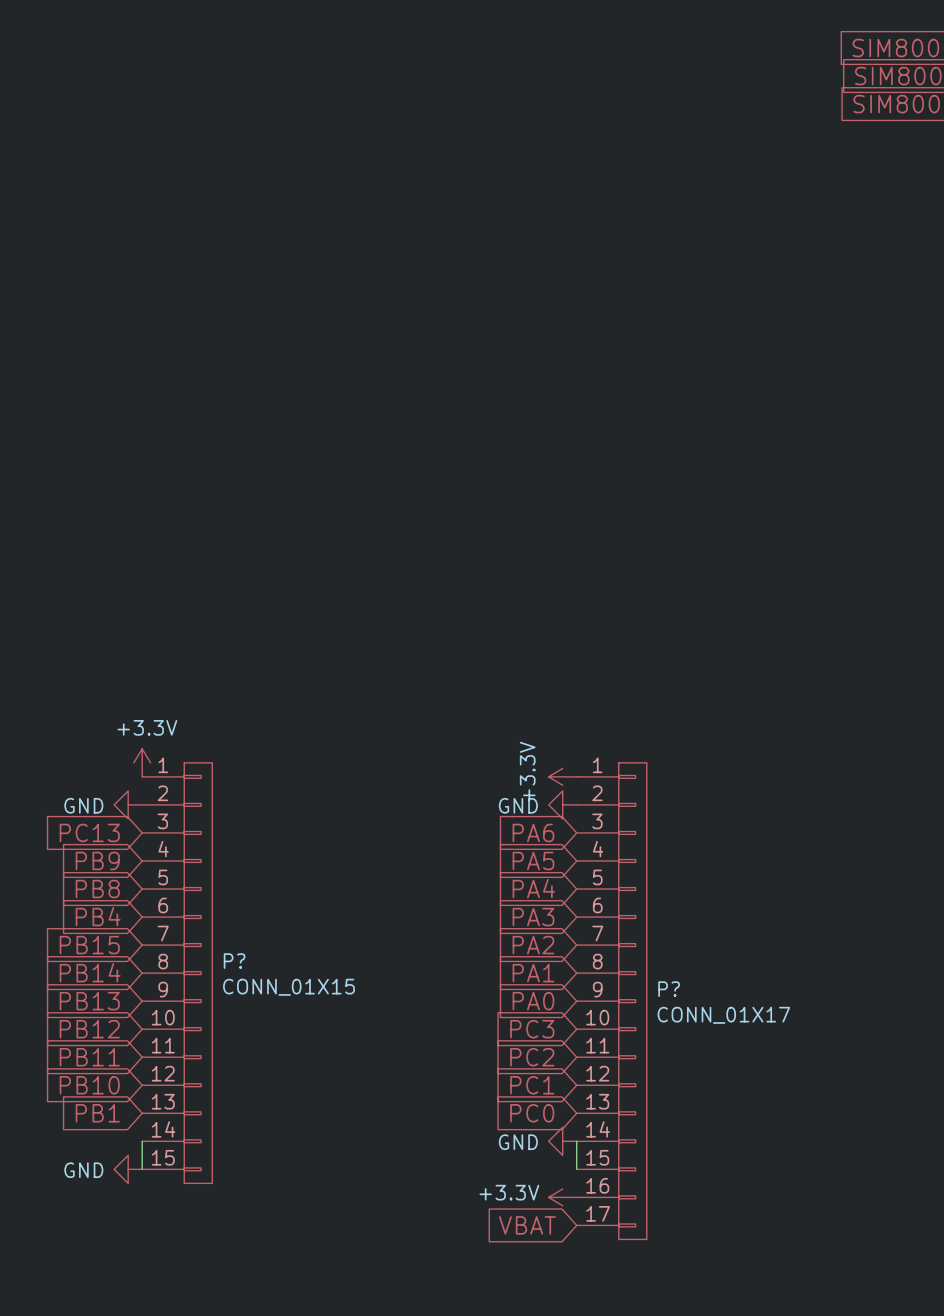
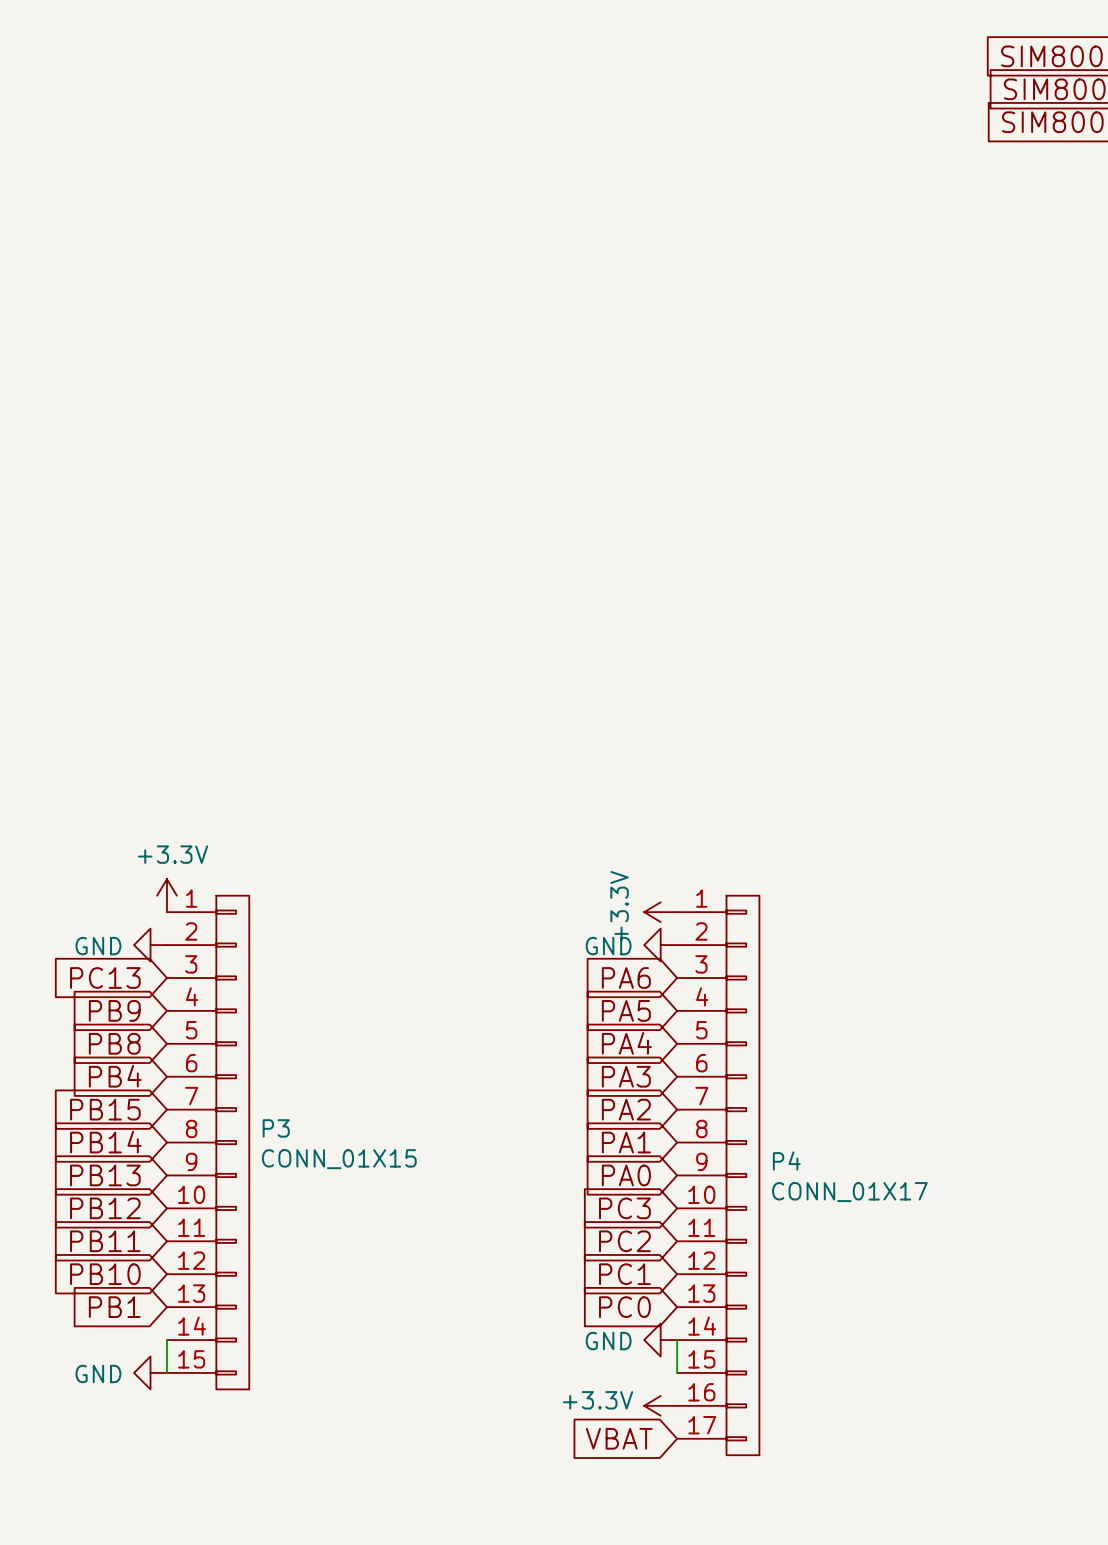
P? name: P? (234, 961) -> P3 (276, 1128)
P? name: P? (669, 989) -> P4 (786, 1160)

